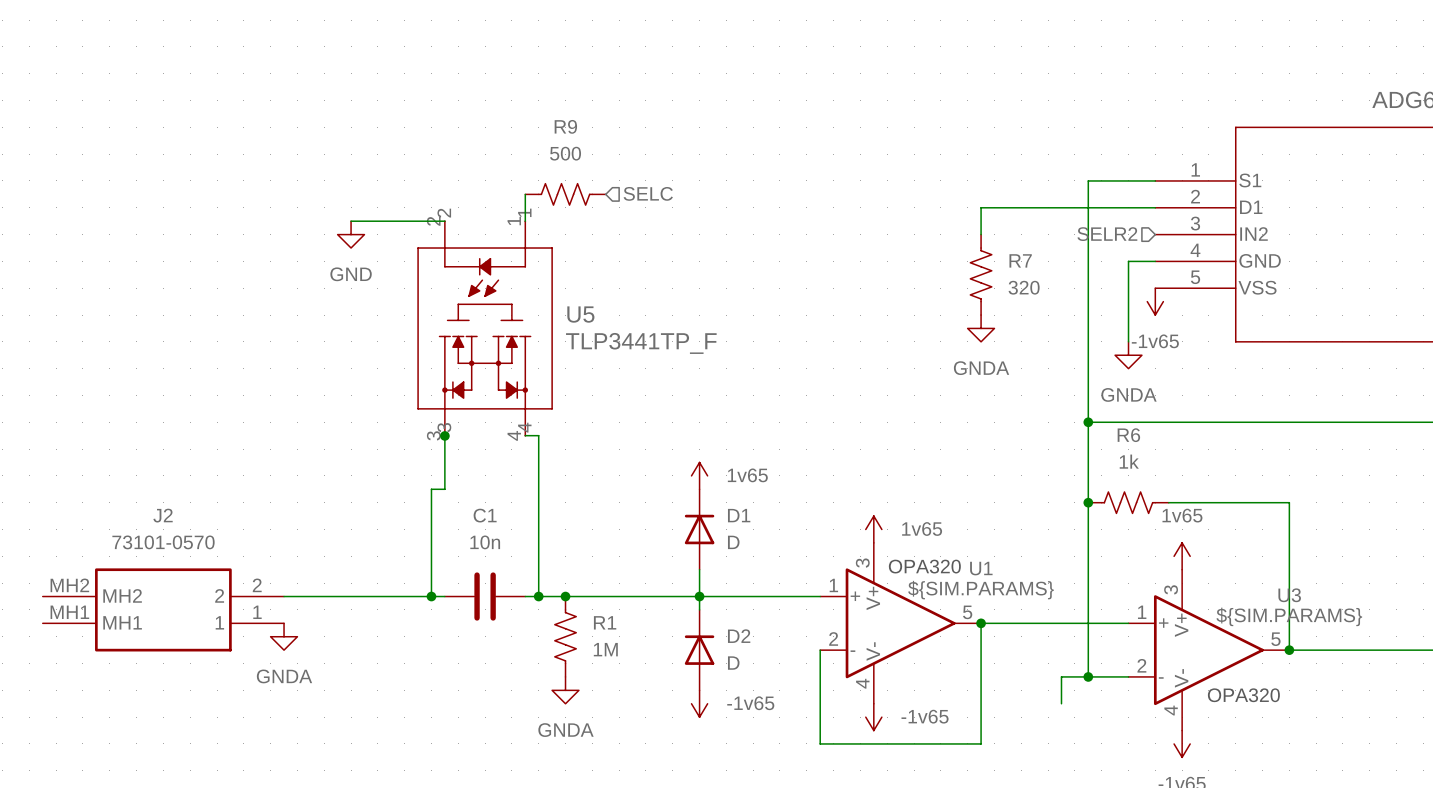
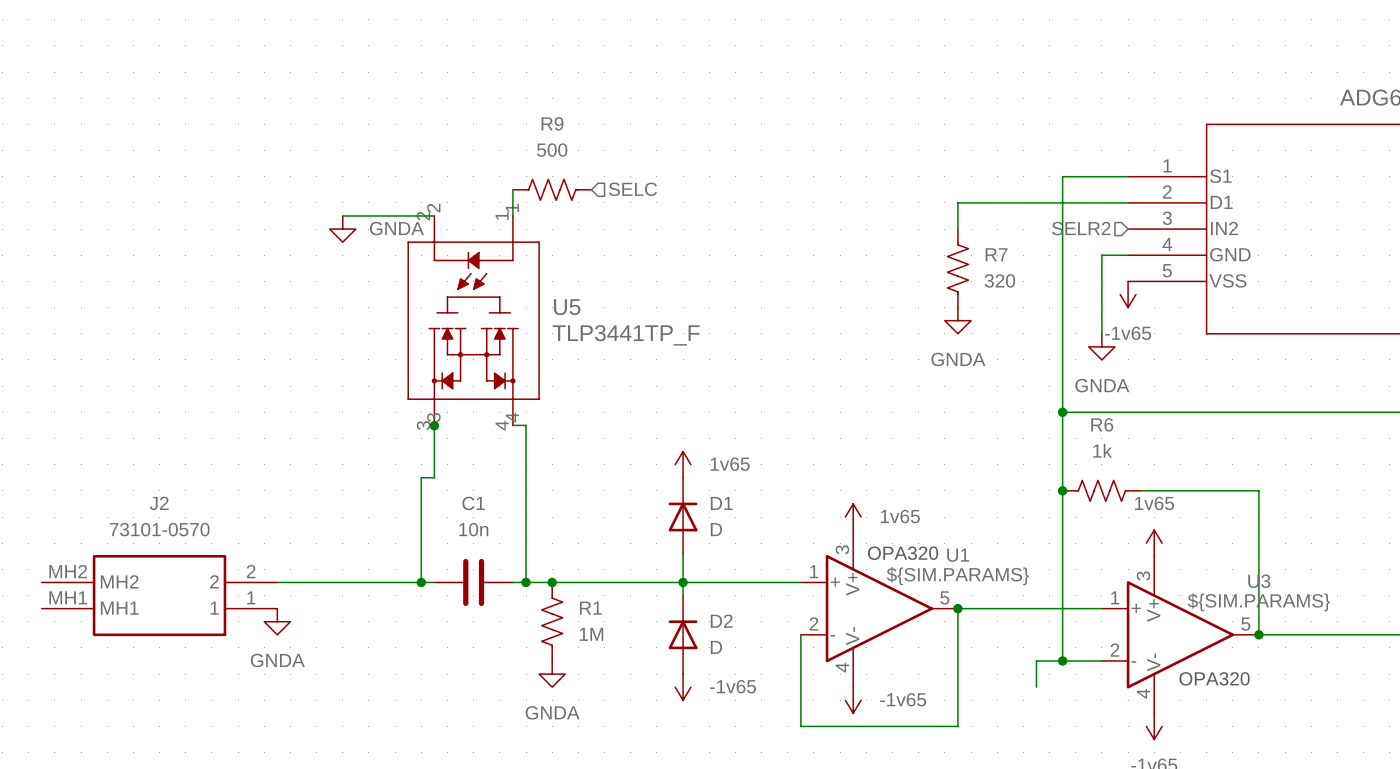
power symbol: GND (351, 234) -> GNDA (342, 229)

